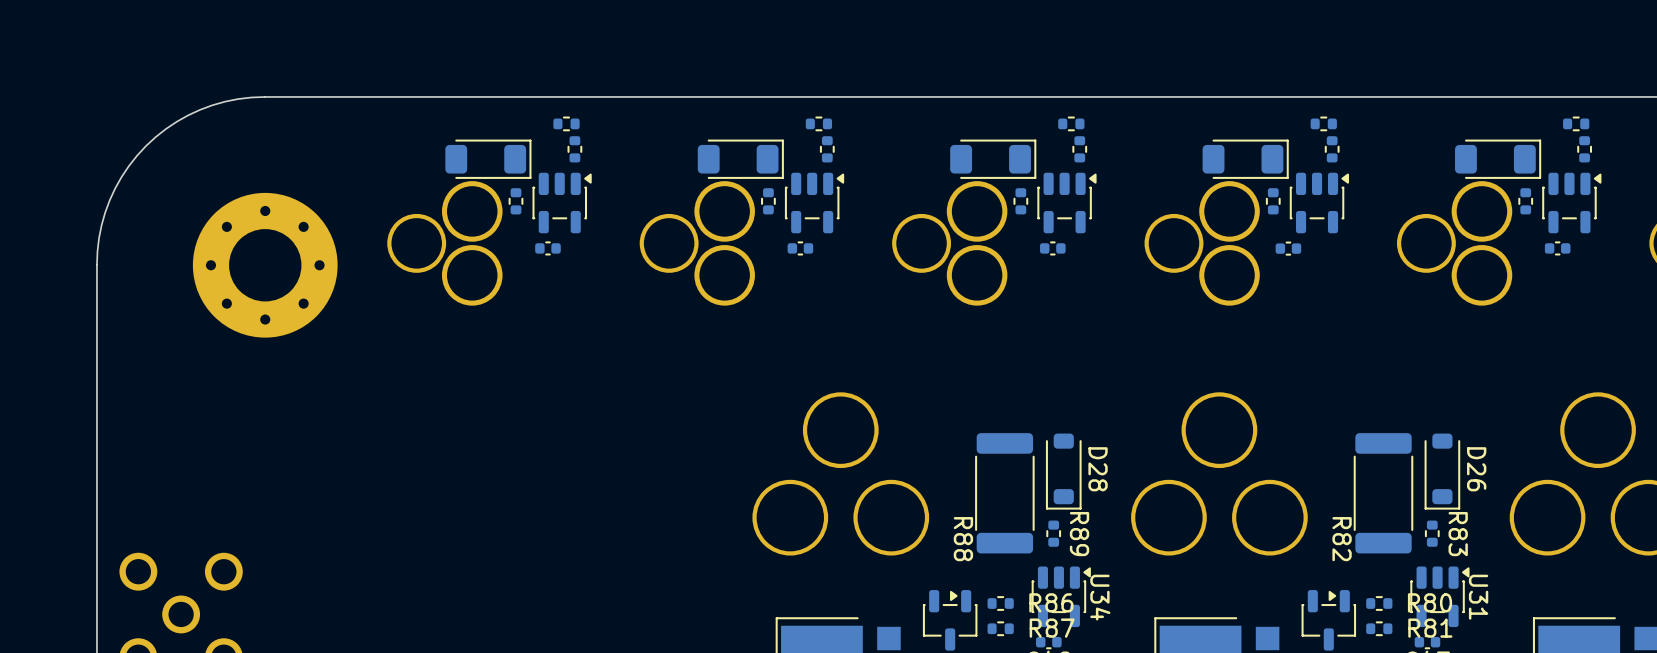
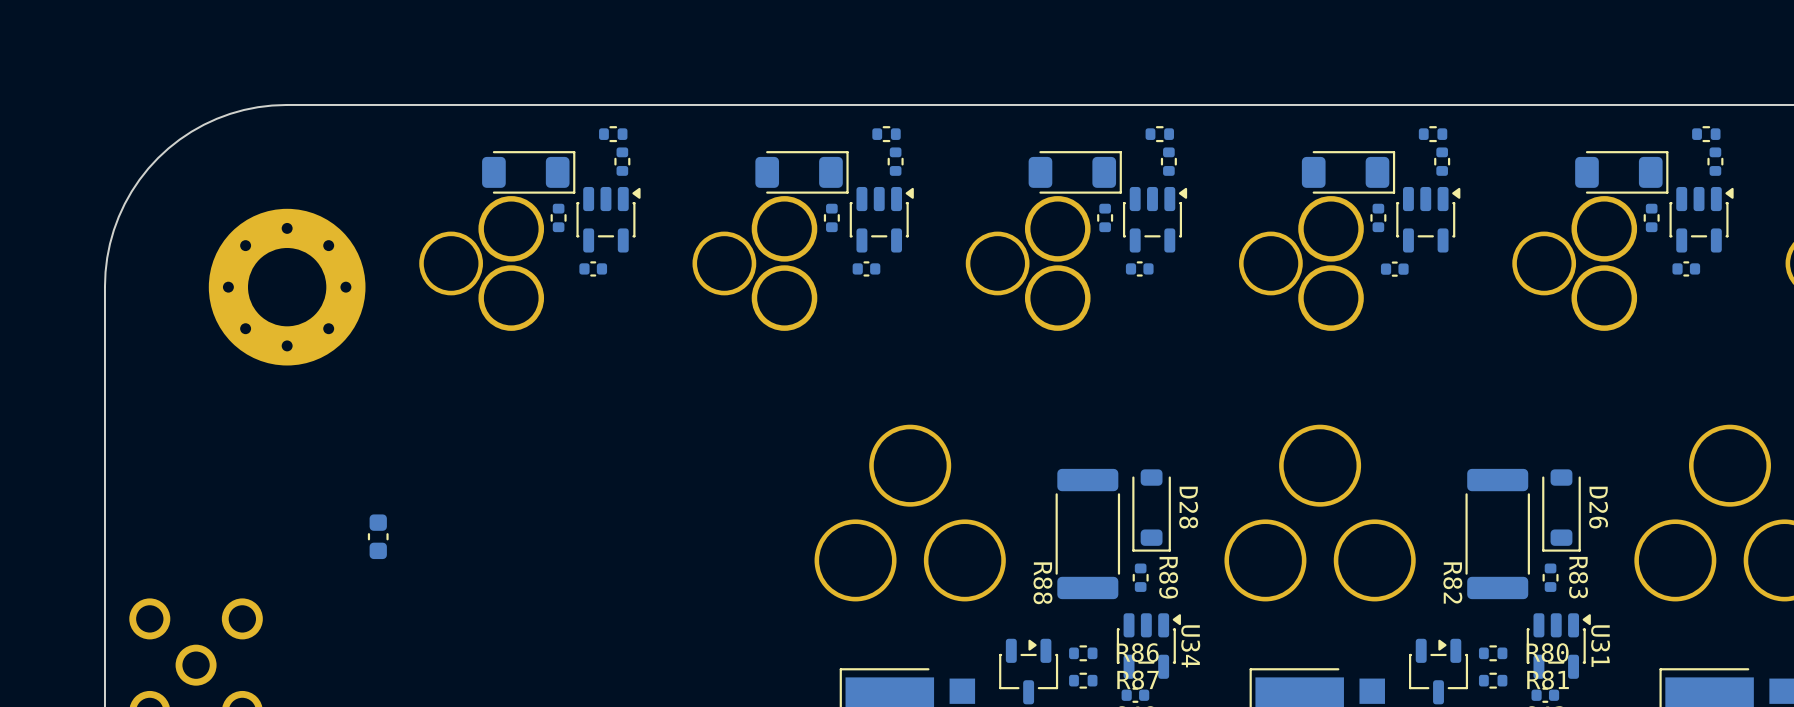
part: none -> (378, 536)

